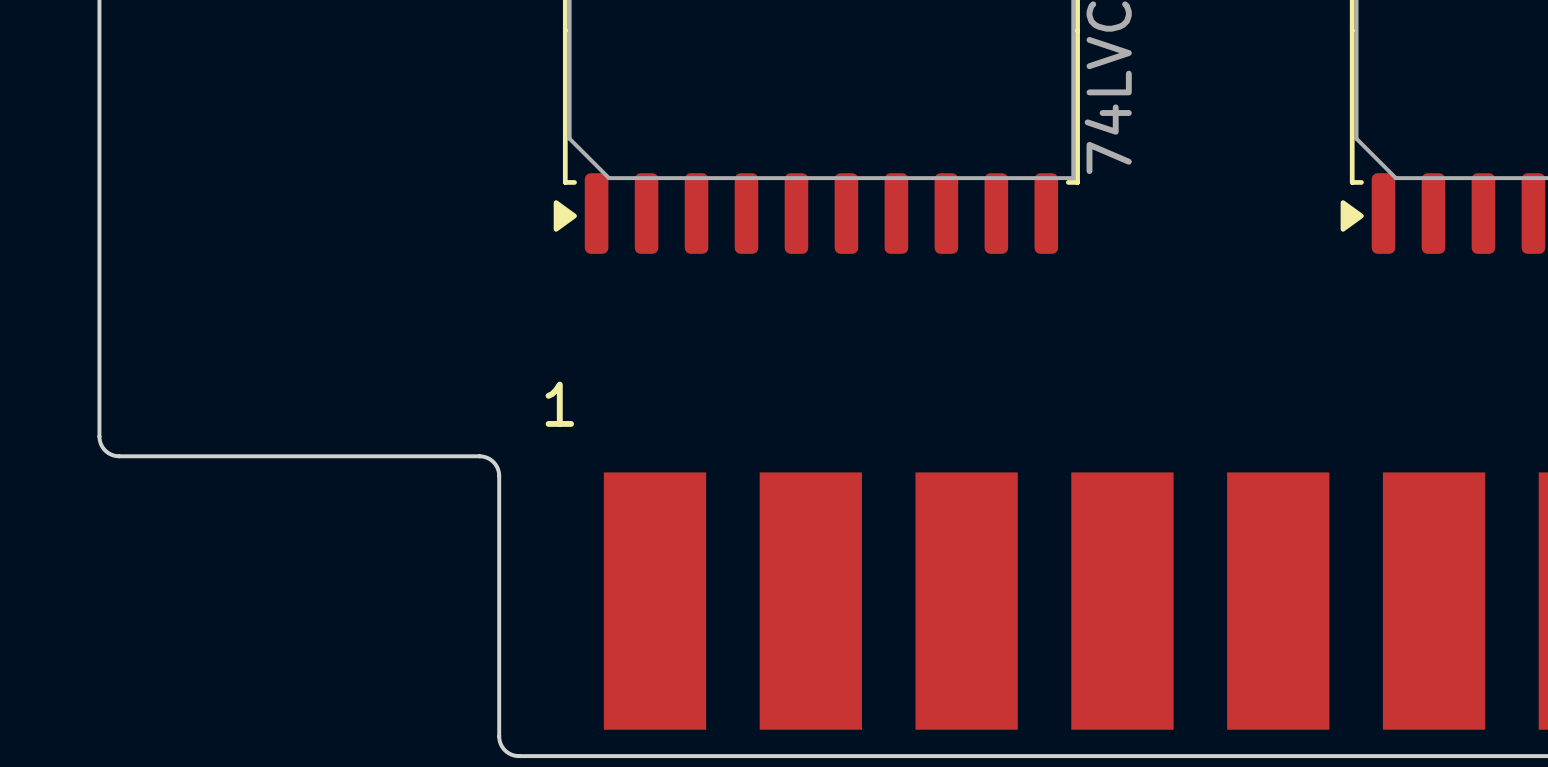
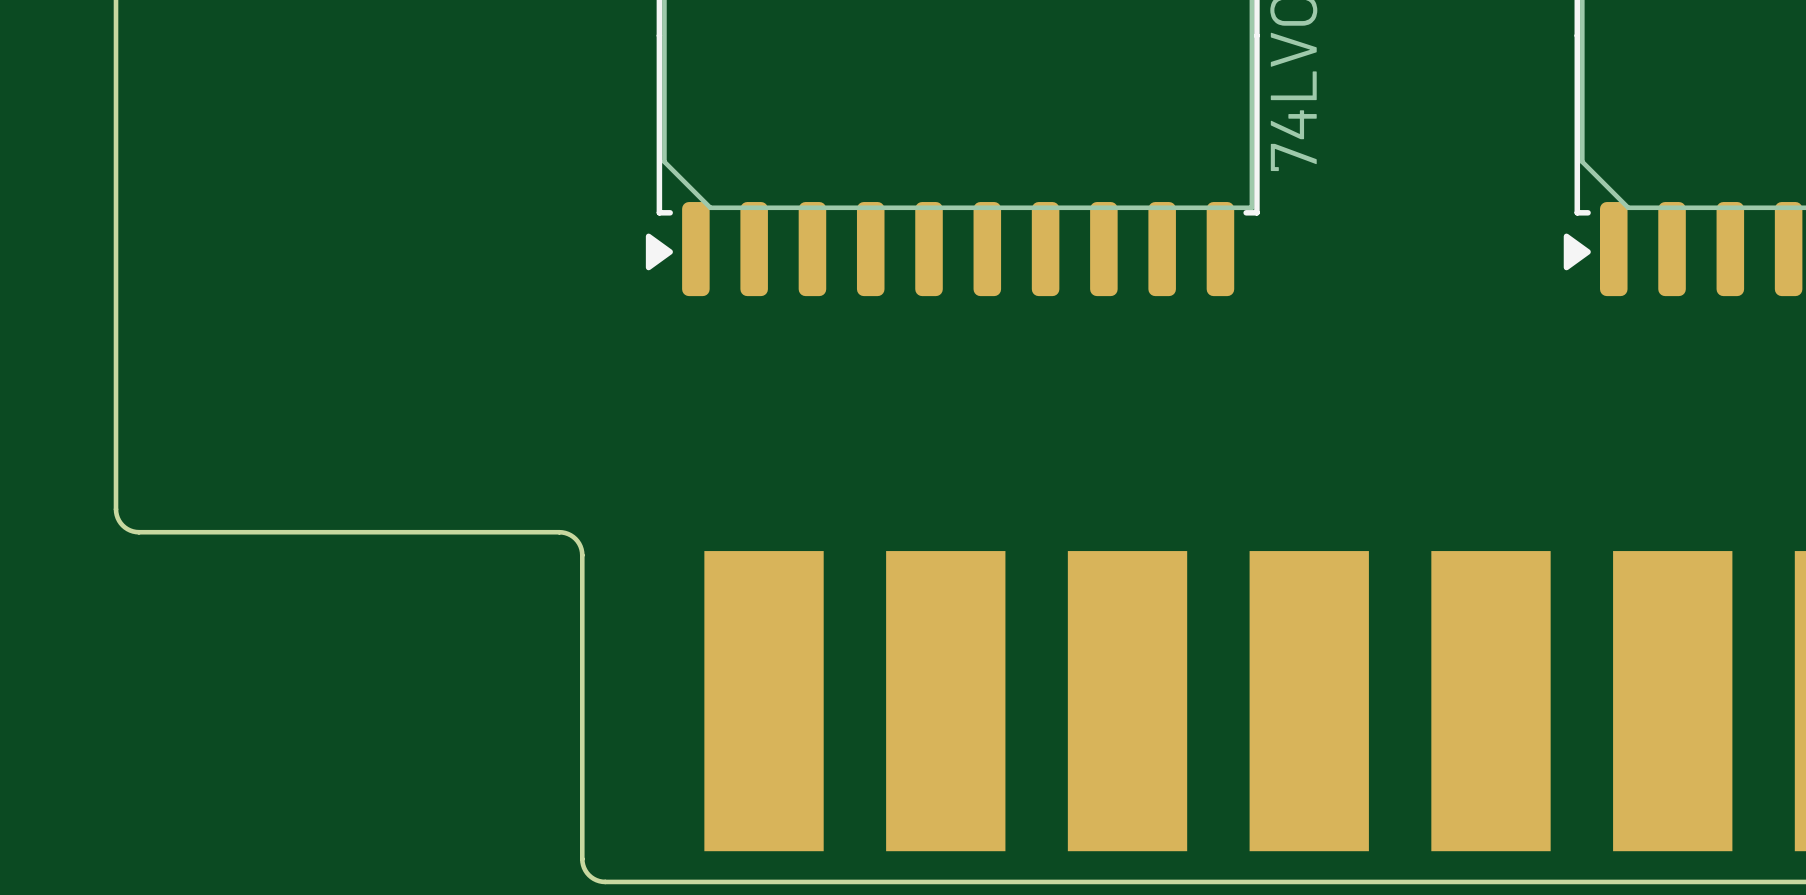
part text: 1 (559, 404) -> none

